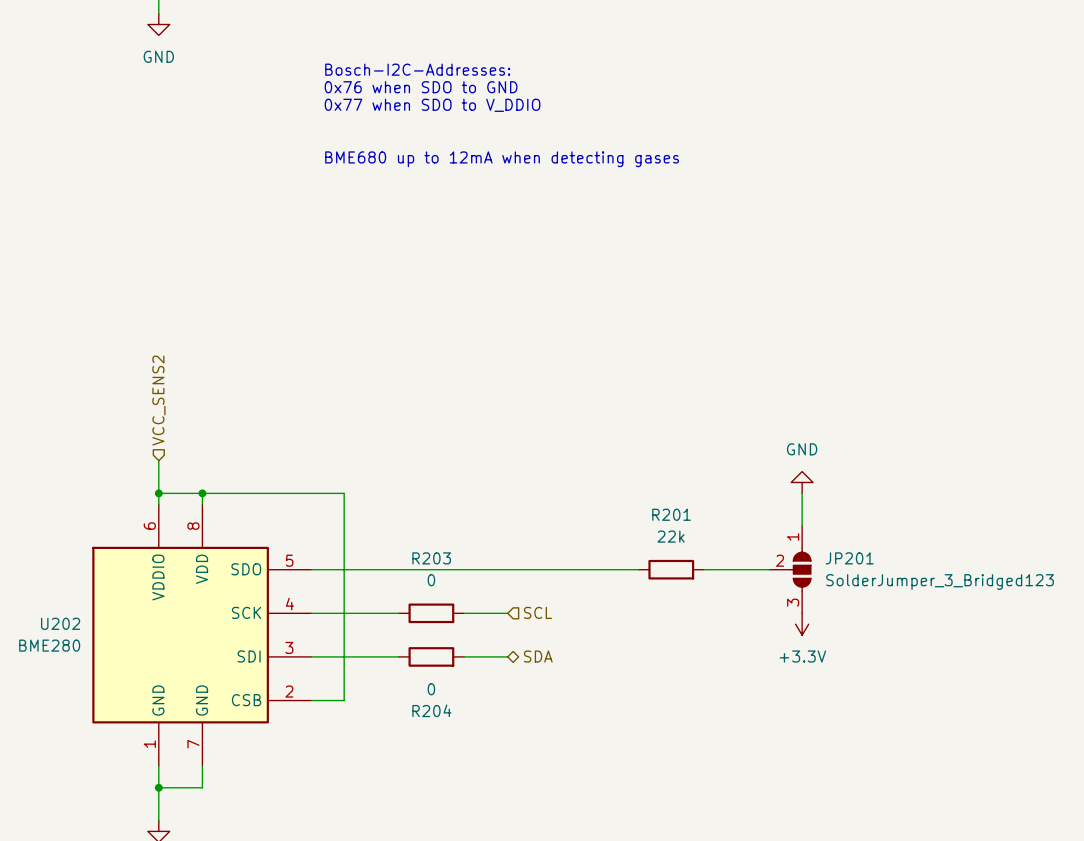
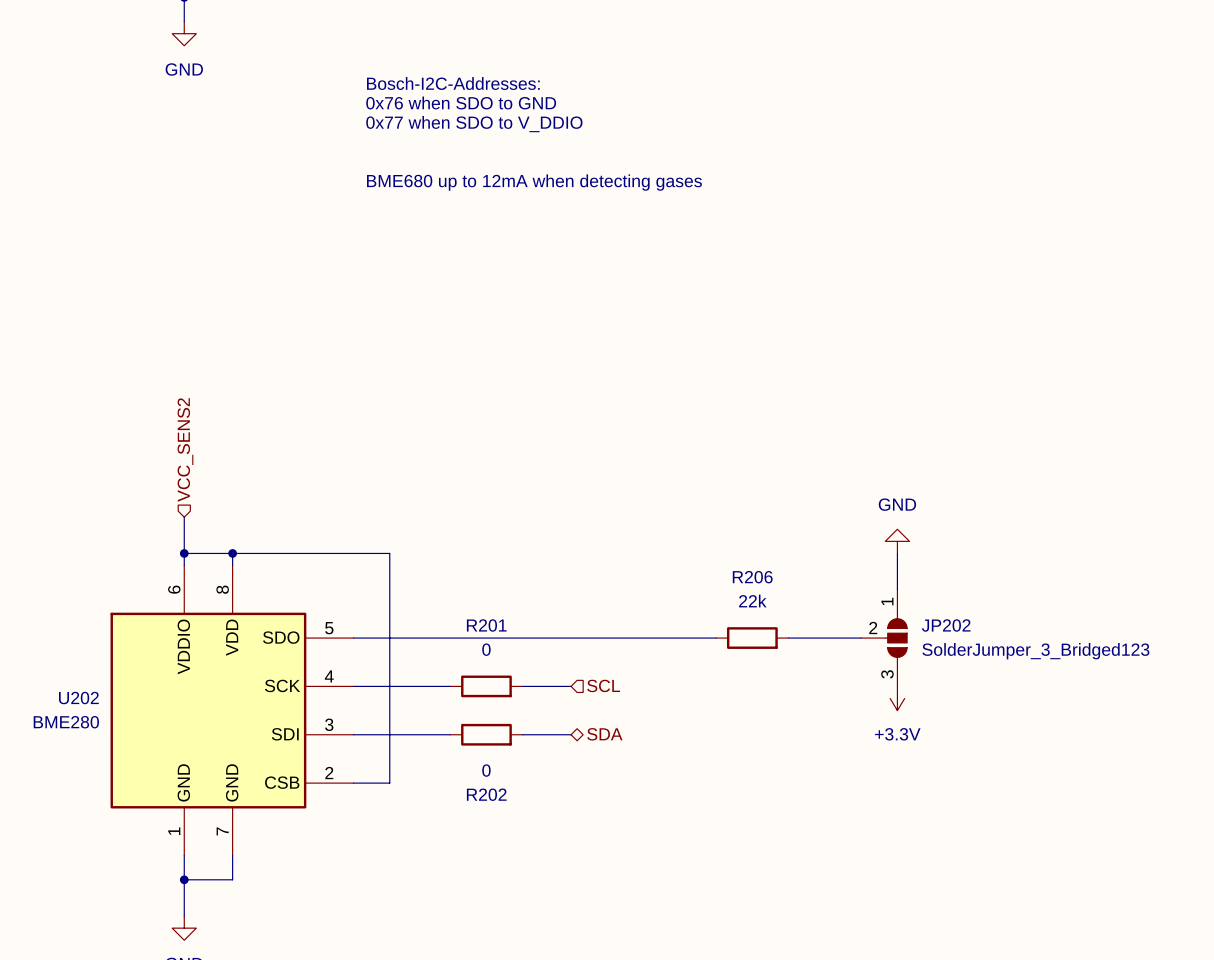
R201 name: R201 (671, 514) -> R206 (752, 577)
R203 name: R203 (431, 558) -> R201 (486, 625)
JP201 name: JP201 (849, 558) -> JP202 (946, 625)
R204 name: R204 (431, 710) -> R202 (486, 794)

